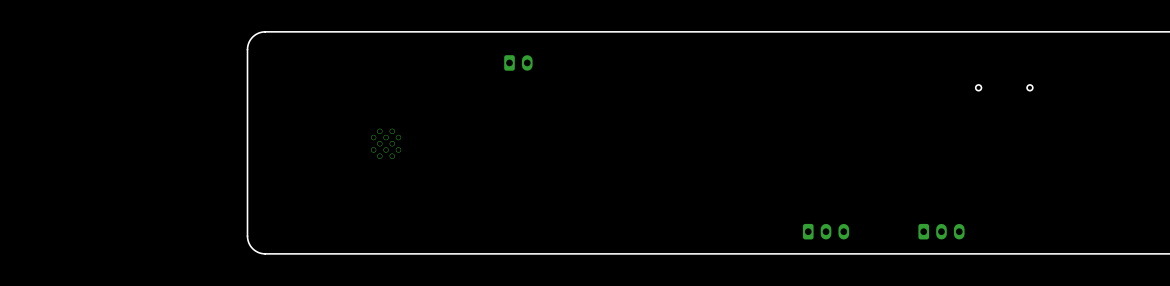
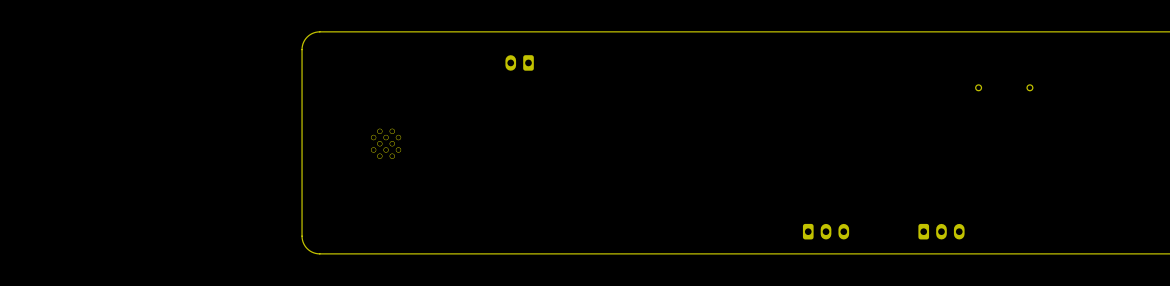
board edge: (319, 31) (261, 32) (251, 38) (247, 49) (248, 241) (254, 250) (263, 253) (319, 253) -> (319, 31) (307, 37) (302, 49) (302, 238) (307, 248) (319, 253)
part rotation: 0° (518, 62) -> 180° (519, 62)

